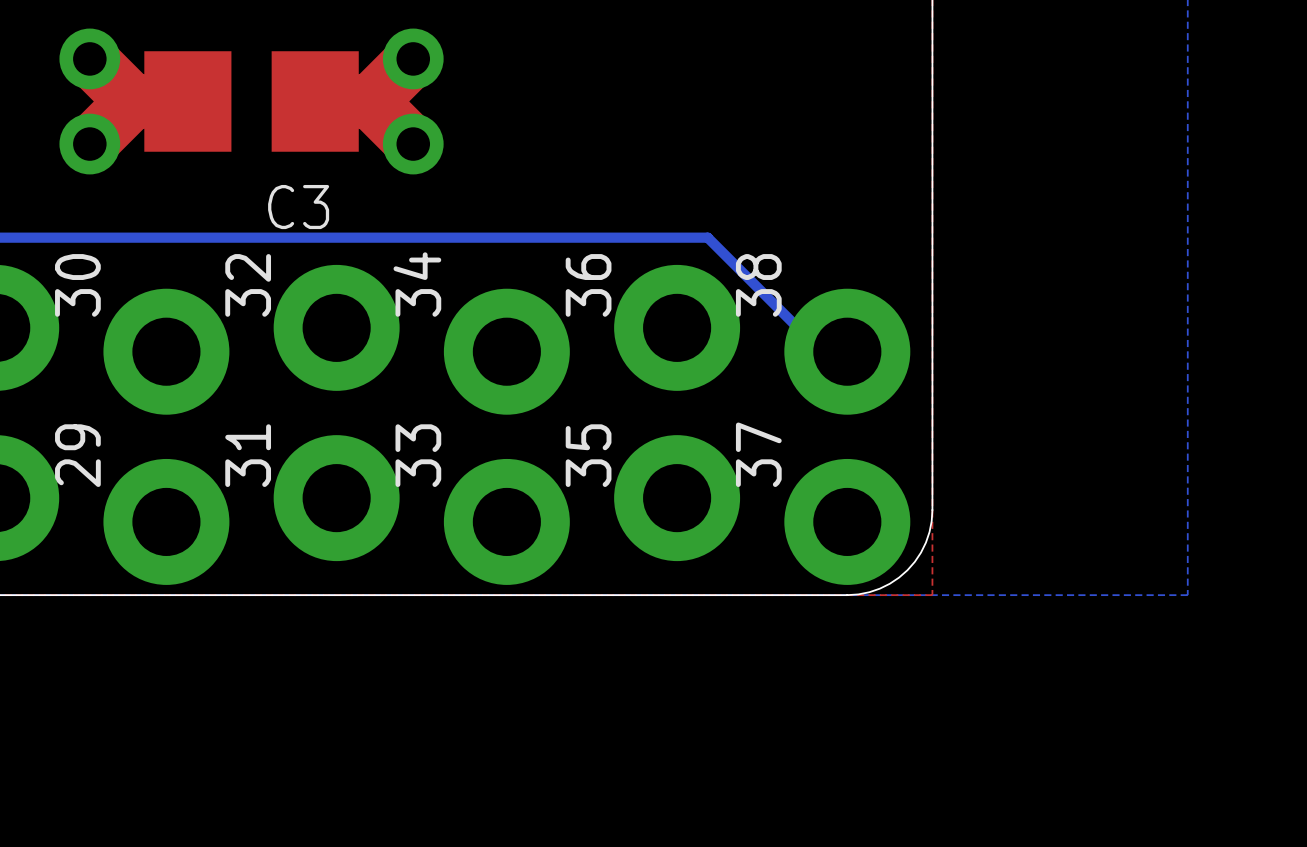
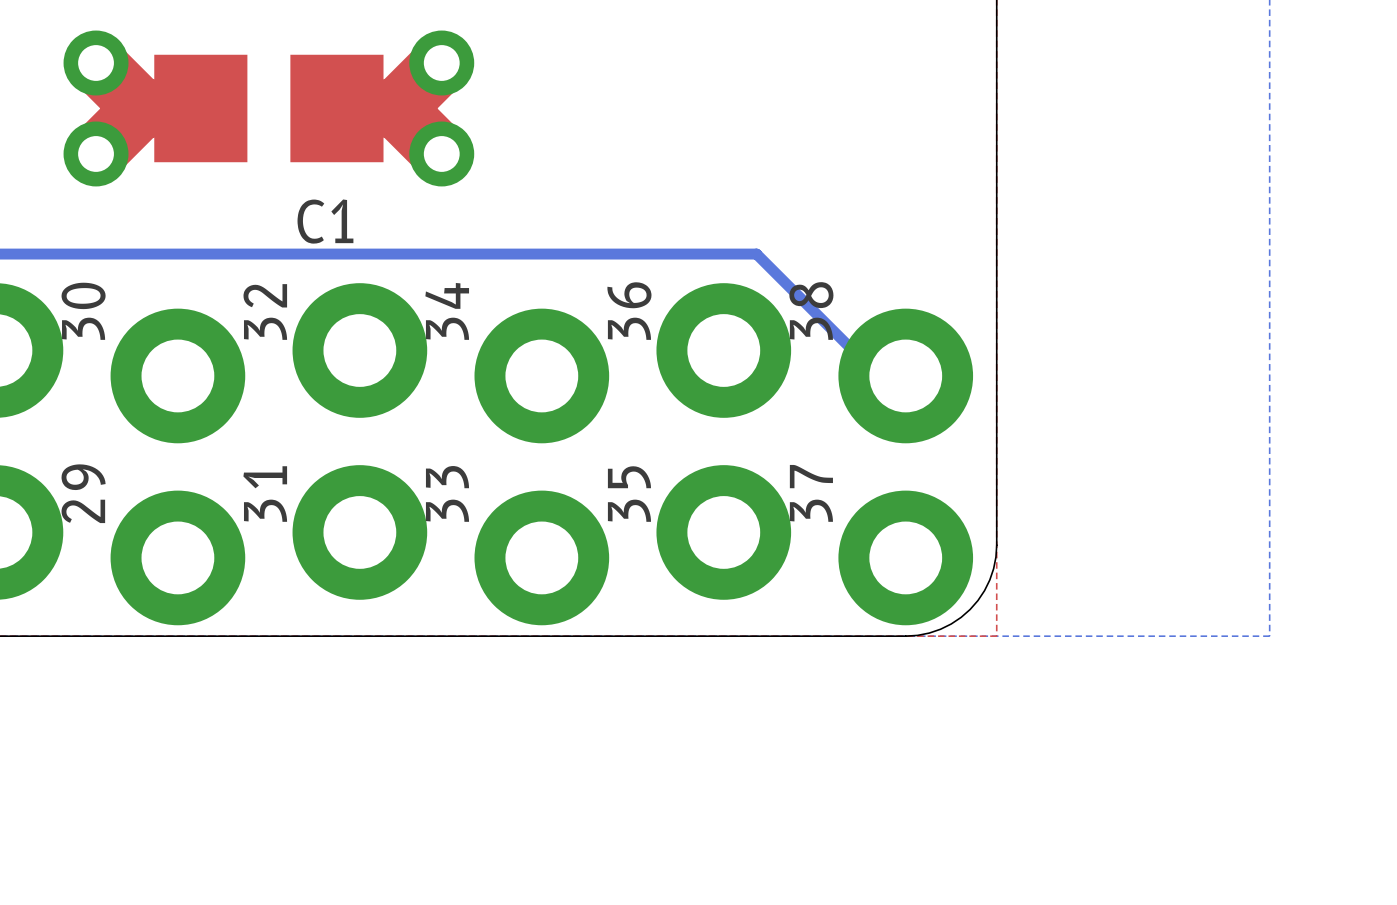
C3 name: C3 (298, 207) -> C1 (325, 221)

